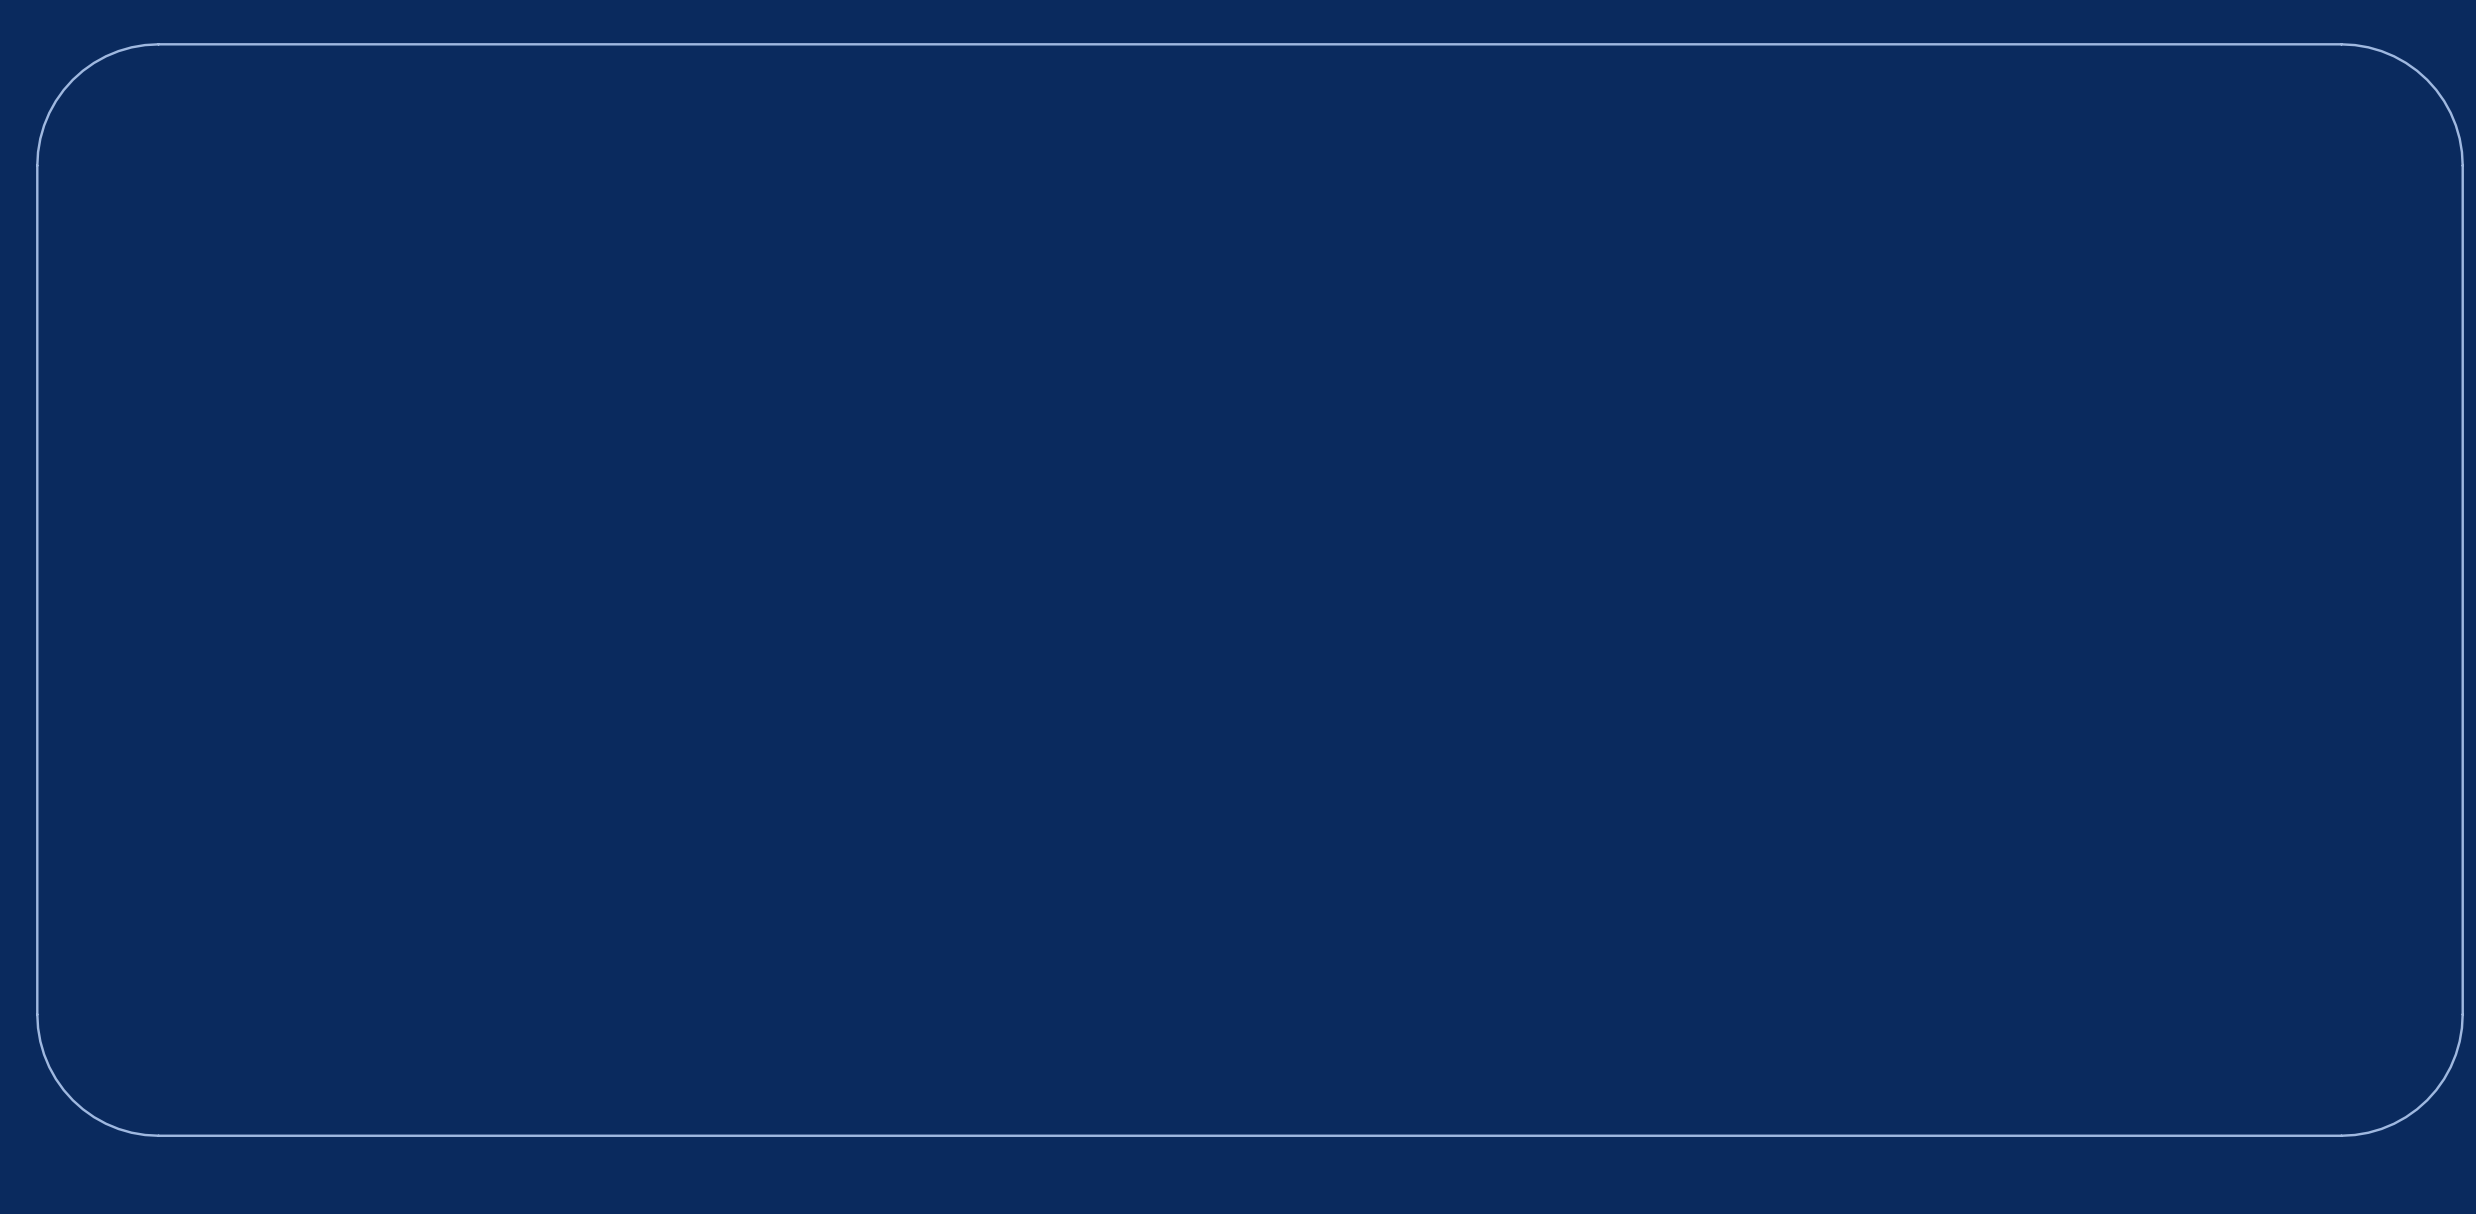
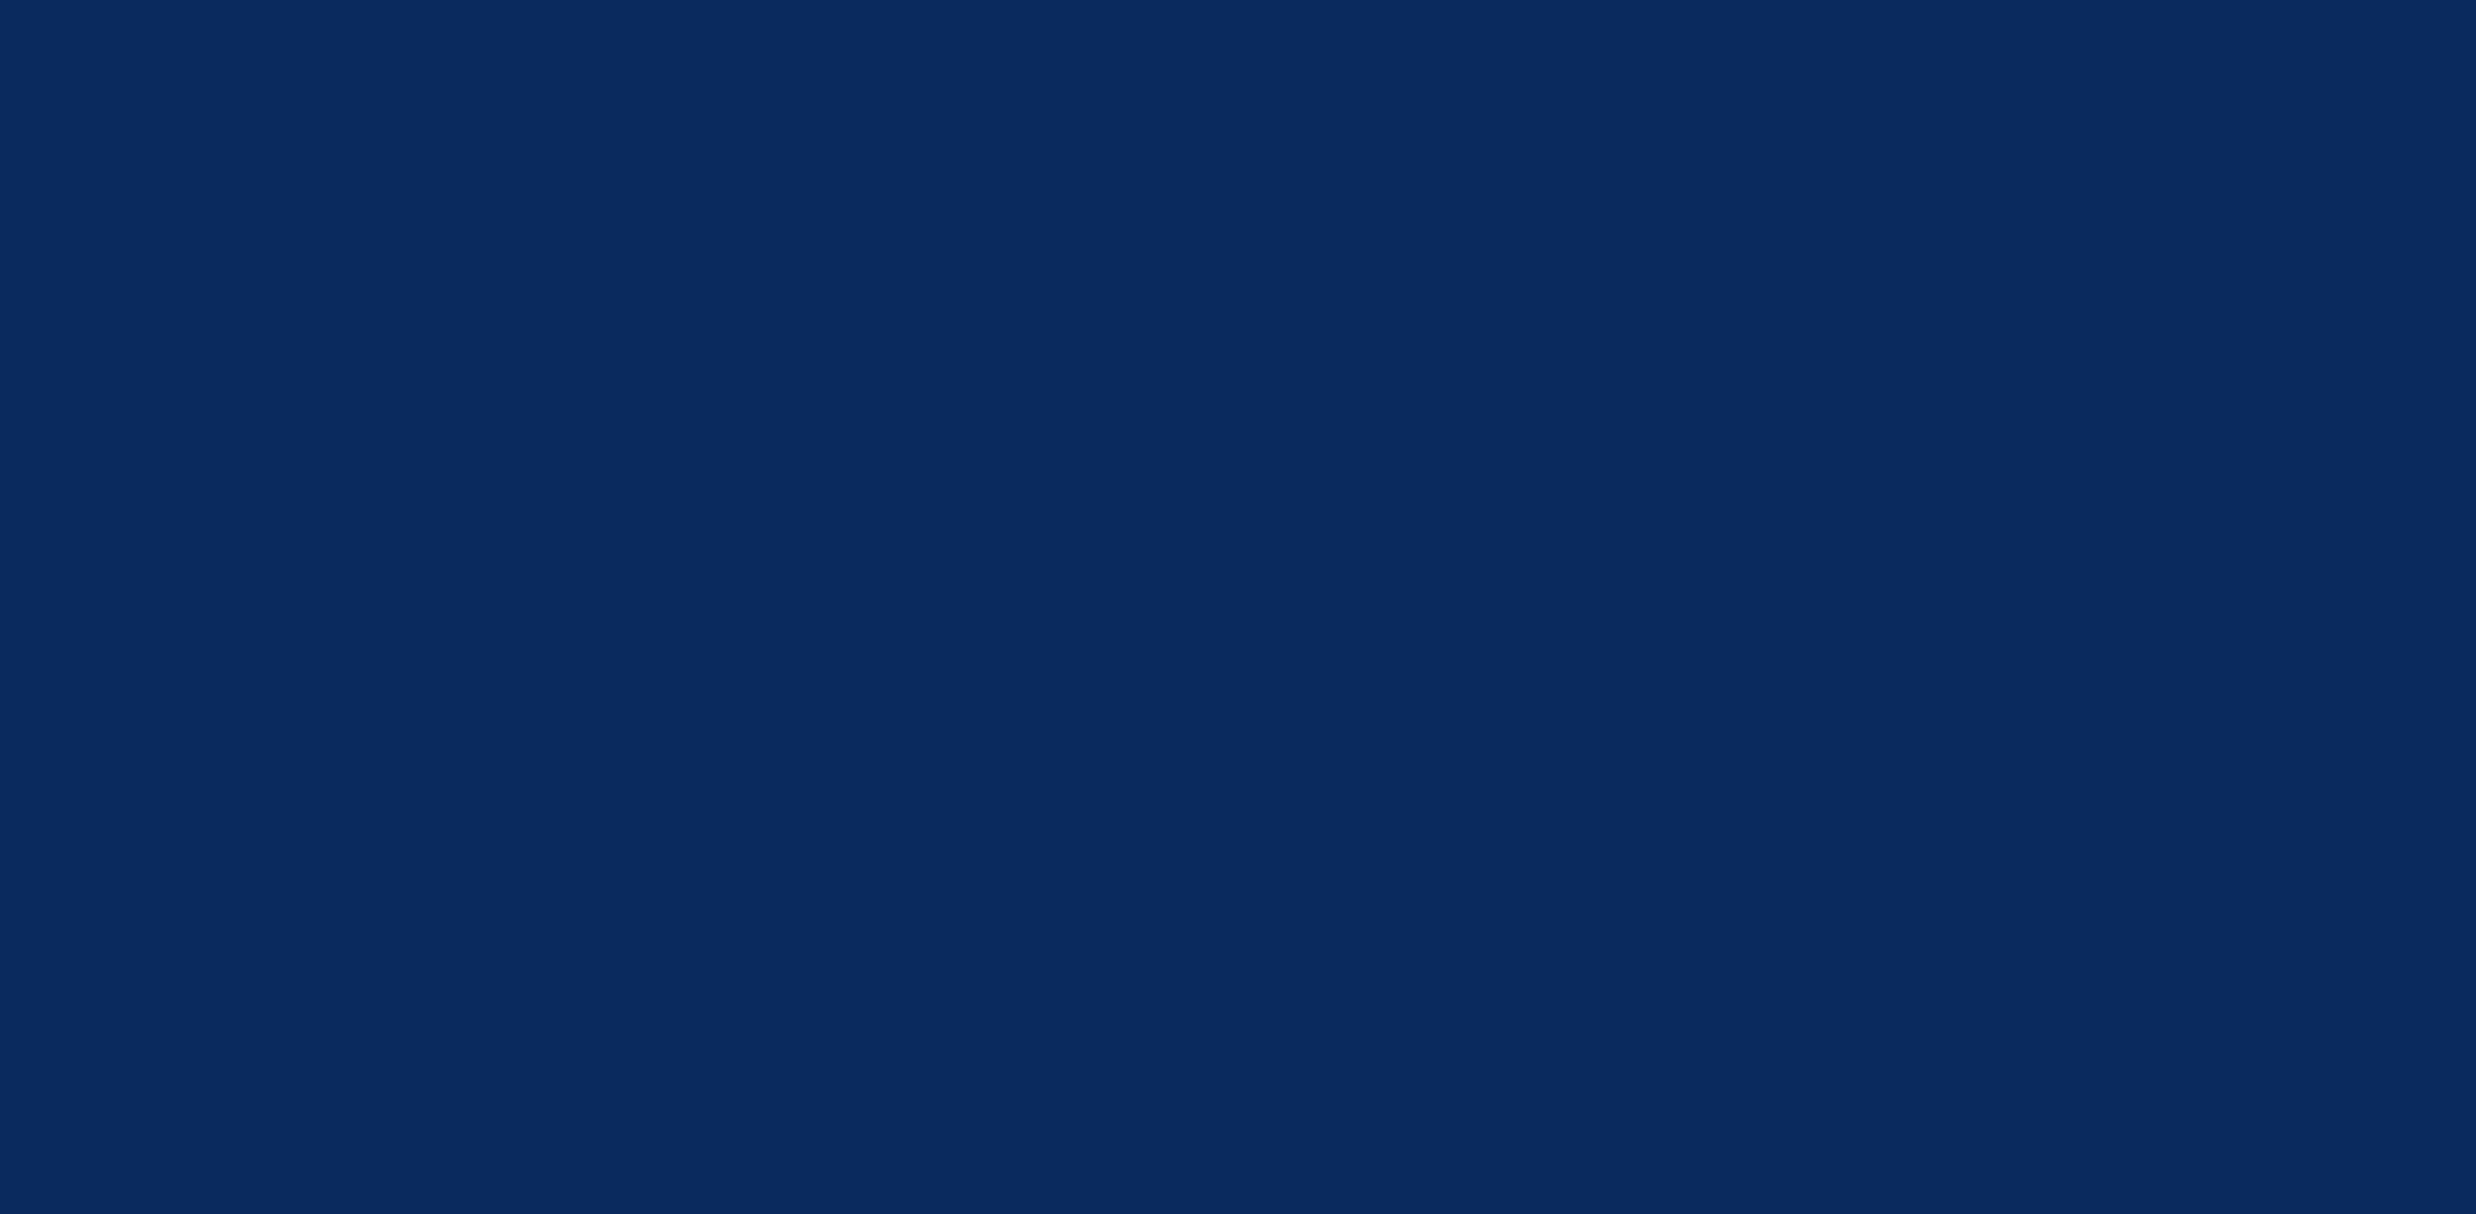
line: (158, 44) (2341, 44) (2368, 47) (2394, 56) (2417, 70) (2436, 89) (2444, 101) (2450, 112) (2459, 138) (2462, 165) (2462, 1014) (2459, 1041) (2450, 1067) (2436, 1090) (2427, 1100) (2405, 1117) (2394, 1123) (2368, 1132) (2341, 1135) (158, 1135) (131, 1132) (105, 1123) (82, 1109) (63, 1090) (55, 1079) (44, 1054) (38, 1028) (37, 165) (38, 152) (44, 125) (55, 101) (72, 79) (94, 62) (105, 56) (131, 47) (158, 44) -> none

